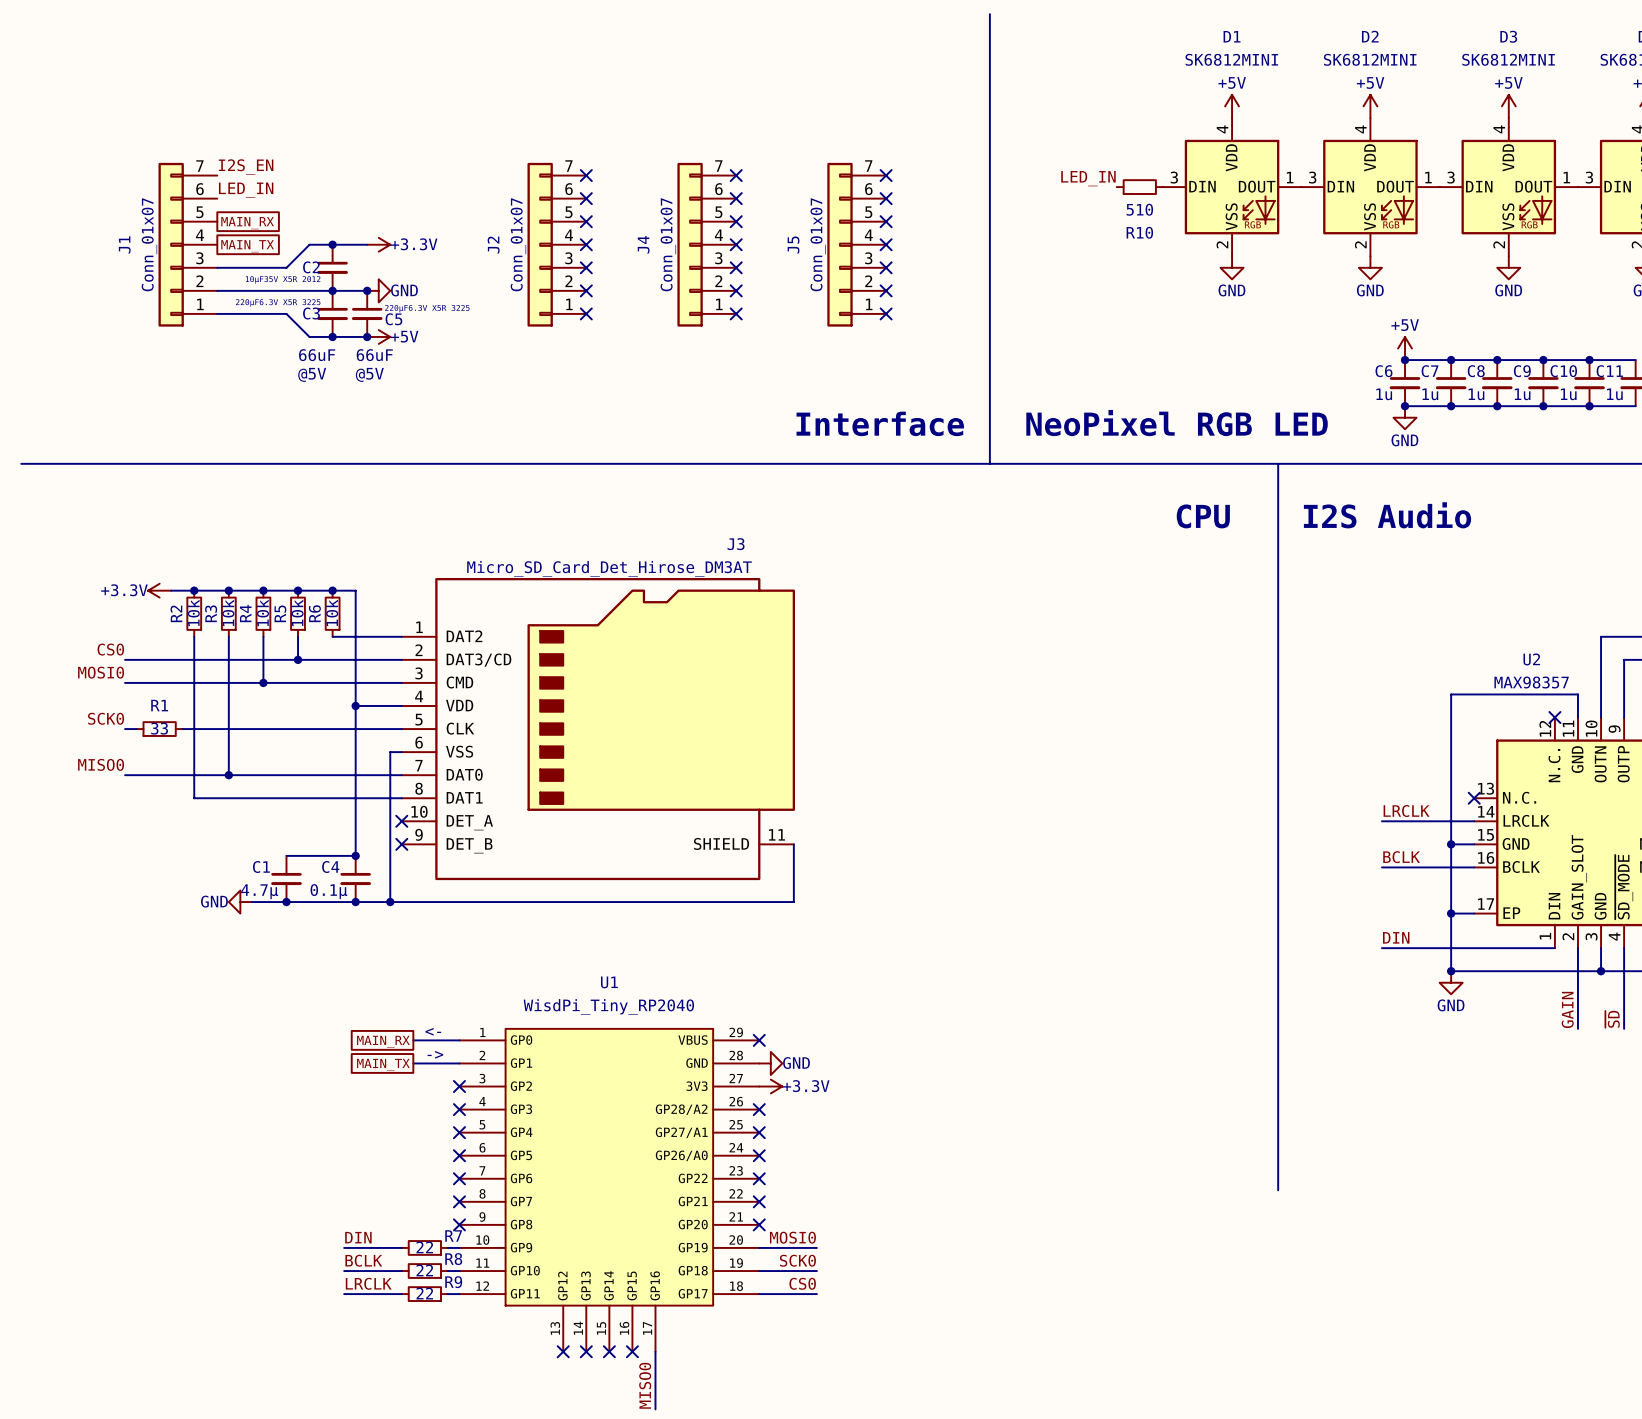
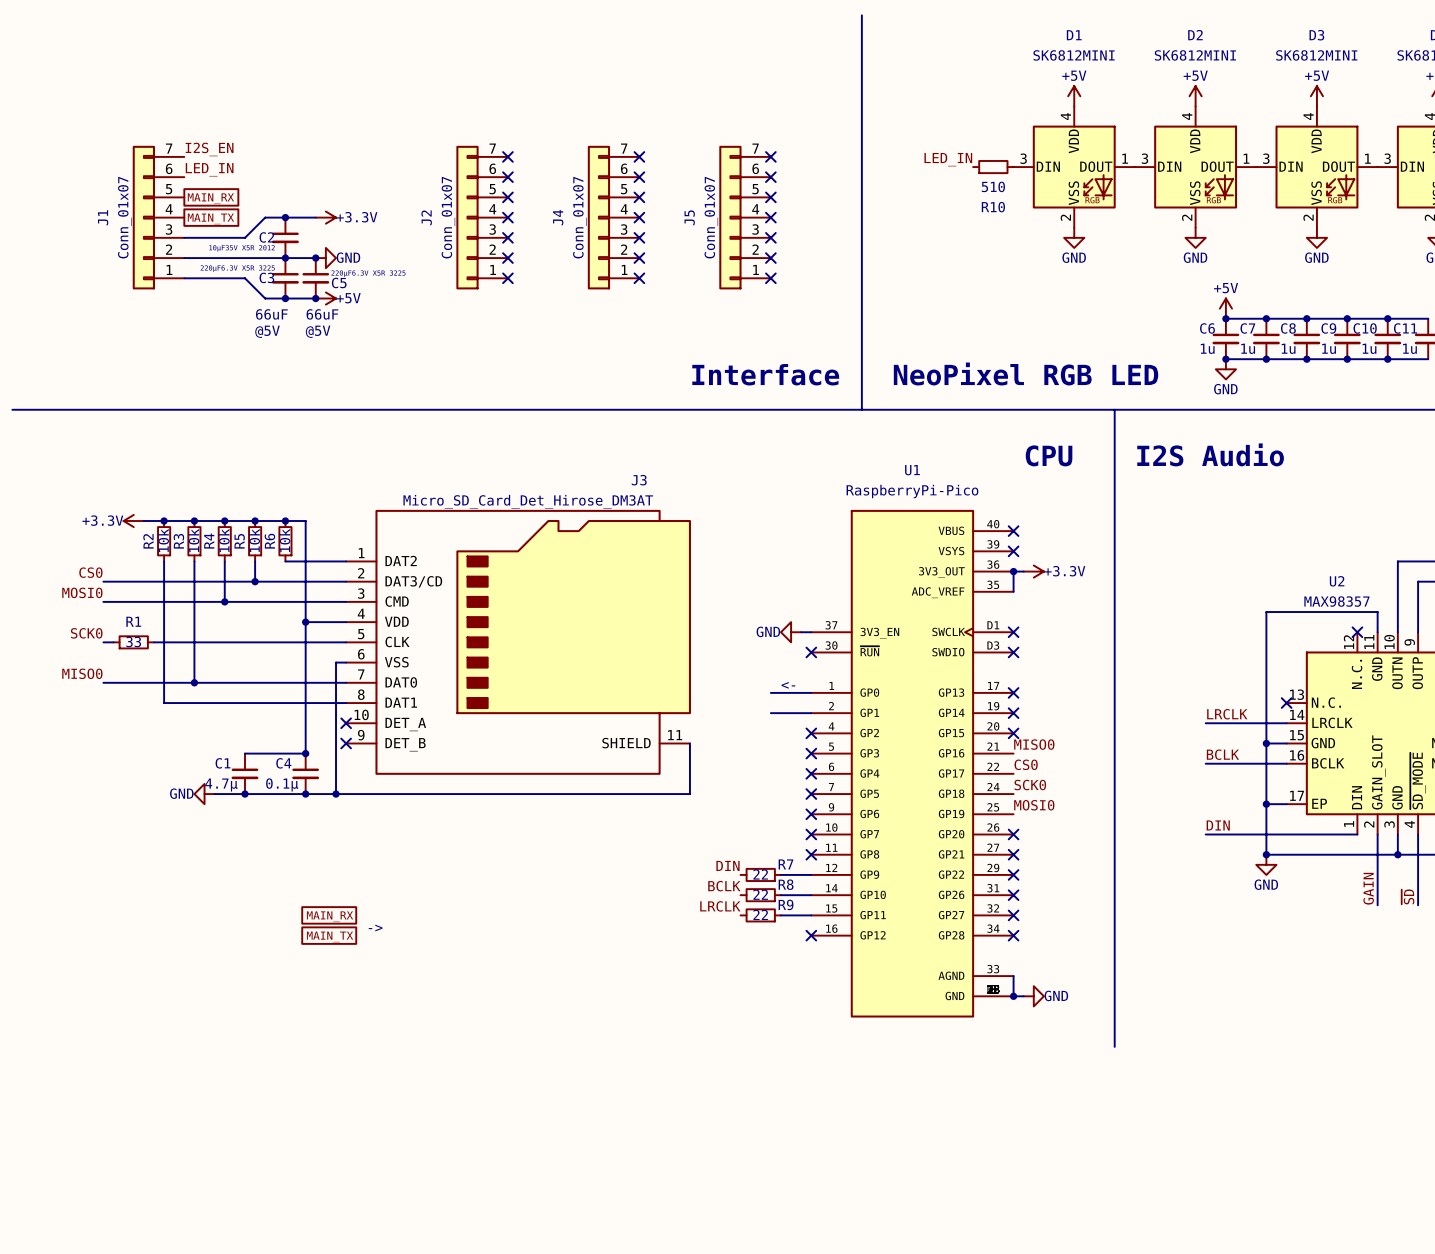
no-connect mark: none -> (1013, 531)
no-connect mark: none -> (1013, 551)
junction: none -> (1013, 571)
wire: none -> (1023, 571) (1013, 571) (1013, 591)
power symbol: none -> +3.3V (1033, 571)
power symbol: none -> GND (791, 632)
wire: none -> (801, 632) (811, 632)
no-connect mark: none -> (1013, 632)
no-connect mark: none -> (811, 652)
no-connect mark: none -> (1013, 652)
text: none -> <- (788, 685)
wire: none -> (770, 692) (811, 692)
no-connect mark: none -> (1013, 692)
wire: none -> (770, 713) (811, 713)
no-connect mark: none -> (1013, 713)
no-connect mark: none -> (811, 733)
no-connect mark: none -> (1013, 733)
label: none -> MISO0 (1034, 744)
no-connect mark: none -> (811, 753)
label: none -> CS0 (1026, 764)
no-connect mark: none -> (811, 773)
label: none -> SCK0 (1030, 785)
no-connect mark: none -> (811, 794)
label: none -> MOSI0 (1034, 805)
no-connect mark: none -> (811, 814)
no-connect mark: none -> (811, 834)
no-connect mark: none -> (1013, 834)
no-connect mark: none -> (811, 854)
no-connect mark: none -> (1013, 854)
U1 name position: U1 (609, 982) -> U1 (912, 470)
label: none -> DIN (727, 865)
wire: none -> (780, 874) (811, 874)
no-connect mark: none -> (1013, 874)
U1 value: WisdPi_Tiny_RP2040 (608, 1006) -> RaspberryPi-Pico (912, 491)
label: none -> BCLK (724, 886)
wire: none -> (780, 895) (811, 895)
no-connect mark: none -> (1013, 895)
U1 symbol: [459, 1028, 760, 1352] -> [811, 509, 1014, 1018]
label: none -> LRCLK (720, 906)
text: <- (433, 1031) -> none
wire: (413, 1040) (459, 1040) -> none
no-connect mark: (759, 1040) -> none
wire: none -> (780, 915) (811, 915)
no-connect mark: none -> (1013, 915)
wire: (413, 1063) (459, 1063) -> none
power symbol: GND (770, 1063) -> none
no-connect mark: none -> (811, 935)
no-connect mark: none -> (1013, 935)
no-connect mark: (459, 1086) -> none
power symbol: +3.3V (770, 1086) -> none
no-connect mark: (459, 1109) -> none
no-connect mark: (759, 1109) -> none
wire: none -> (1013, 976) (1013, 996) (1023, 996)
no-connect mark: (459, 1132) -> none
no-connect mark: (759, 1132) -> none
junction: none -> (1013, 996)
power symbol: none -> GND (1033, 996)
no-connect mark: (459, 1155) -> none
no-connect mark: (759, 1155) -> none
no-connect mark: (459, 1178) -> none
no-connect mark: (759, 1178) -> none
no-connect mark: (459, 1201) -> none
no-connect mark: (759, 1201) -> none
no-connect mark: (459, 1224) -> none
no-connect mark: (759, 1224) -> none
label: DIN (358, 1237) -> none
label: MOSI0 (792, 1237) -> none
wire: (344, 1247) (401, 1247) -> none
R7 position: (424, 1247) -> (760, 874)
wire: (447, 1247) (459, 1247) -> none
wire: (759, 1247) (816, 1247) -> none
label: BCLK (363, 1260) -> none
label: SCK0 (797, 1260) -> none
wire: (344, 1271) (401, 1271) -> none
R8 position: (424, 1271) -> (760, 895)
wire: (447, 1271) (459, 1271) -> none
wire: (759, 1271) (816, 1271) -> none
label: LRCLK (368, 1283) -> none
label: CS0 (802, 1283) -> none
wire: (344, 1294) (401, 1294) -> none
R9 position: (424, 1294) -> (760, 915)
wire: (447, 1294) (459, 1294) -> none
wire: (759, 1294) (816, 1294) -> none
no-connect mark: (563, 1351) -> none
no-connect mark: (586, 1351) -> none
no-connect mark: (609, 1351) -> none
no-connect mark: (632, 1351) -> none
wire: (655, 1351) (655, 1409) -> none
label: MISO0 (645, 1385) -> none

